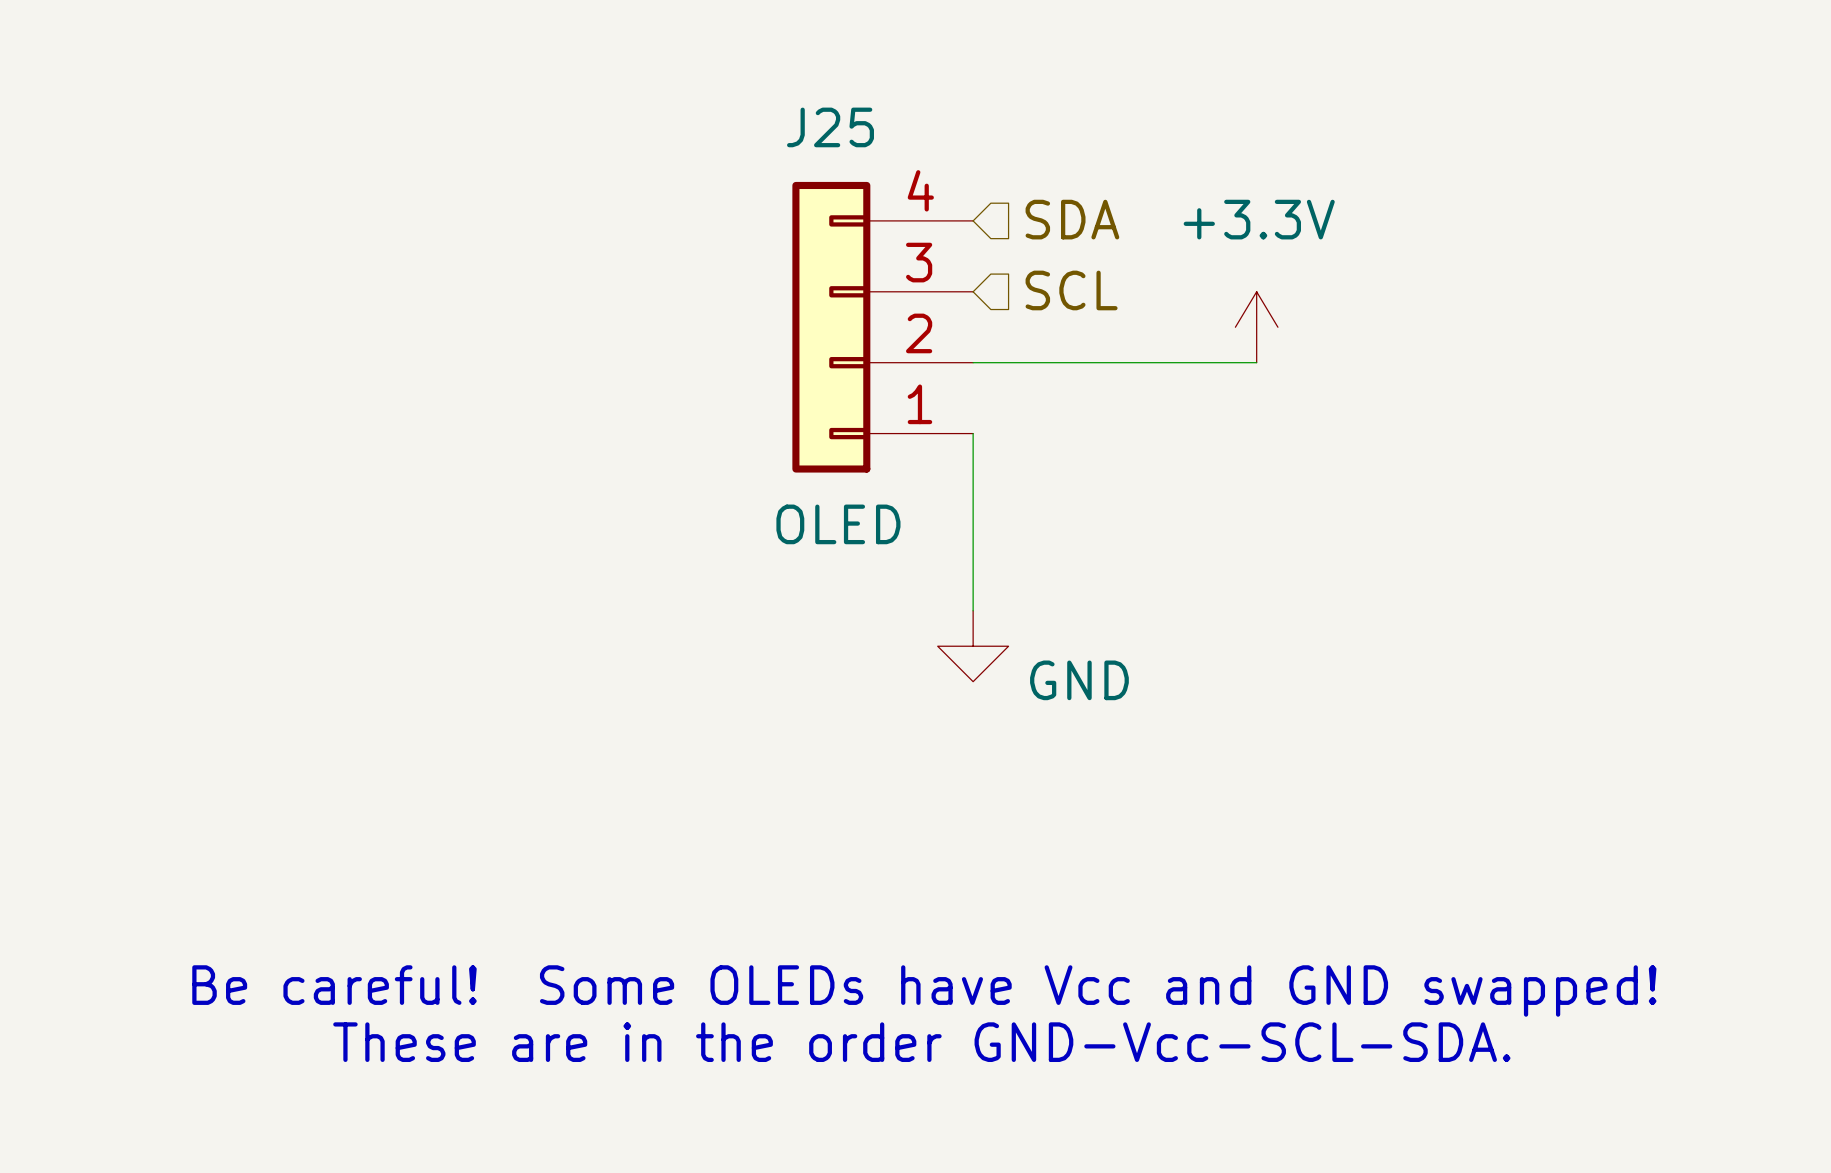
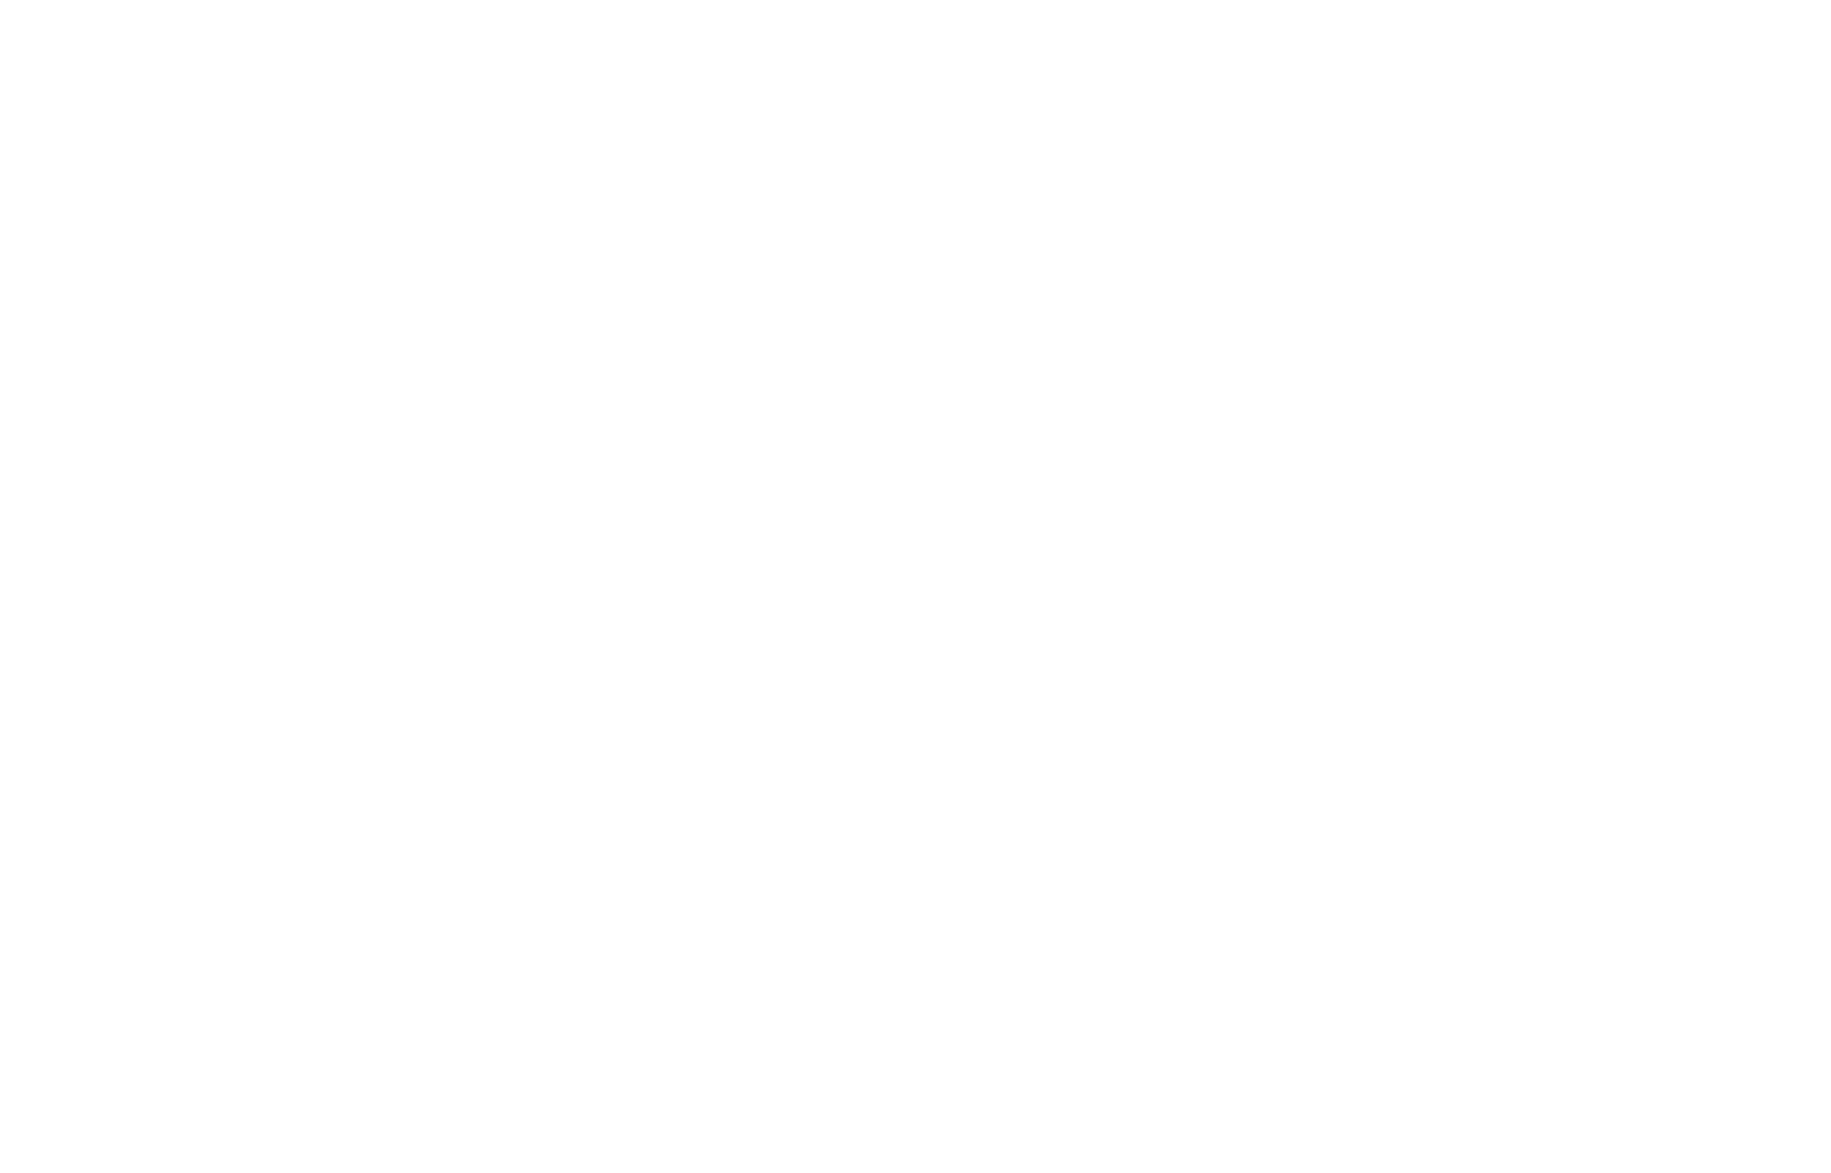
hierarchical label: SDA (1072, 219) -> none
hierarchical label: SCL (1071, 290) -> none
J25: OLED (882, 327) -> none
power symbol: +3.3V (1256, 327) -> none
wire: (973, 362) (1256, 362) -> none
wire: (973, 433) (973, 610) -> none
power symbol: GND (973, 646) -> none
text: Be careful! Some OLEDs have Vcc and GND swapped! (924, 991) -> none
text: These are in the order GND-Vcc-SCL-SDA. (921, 1042) -> none

